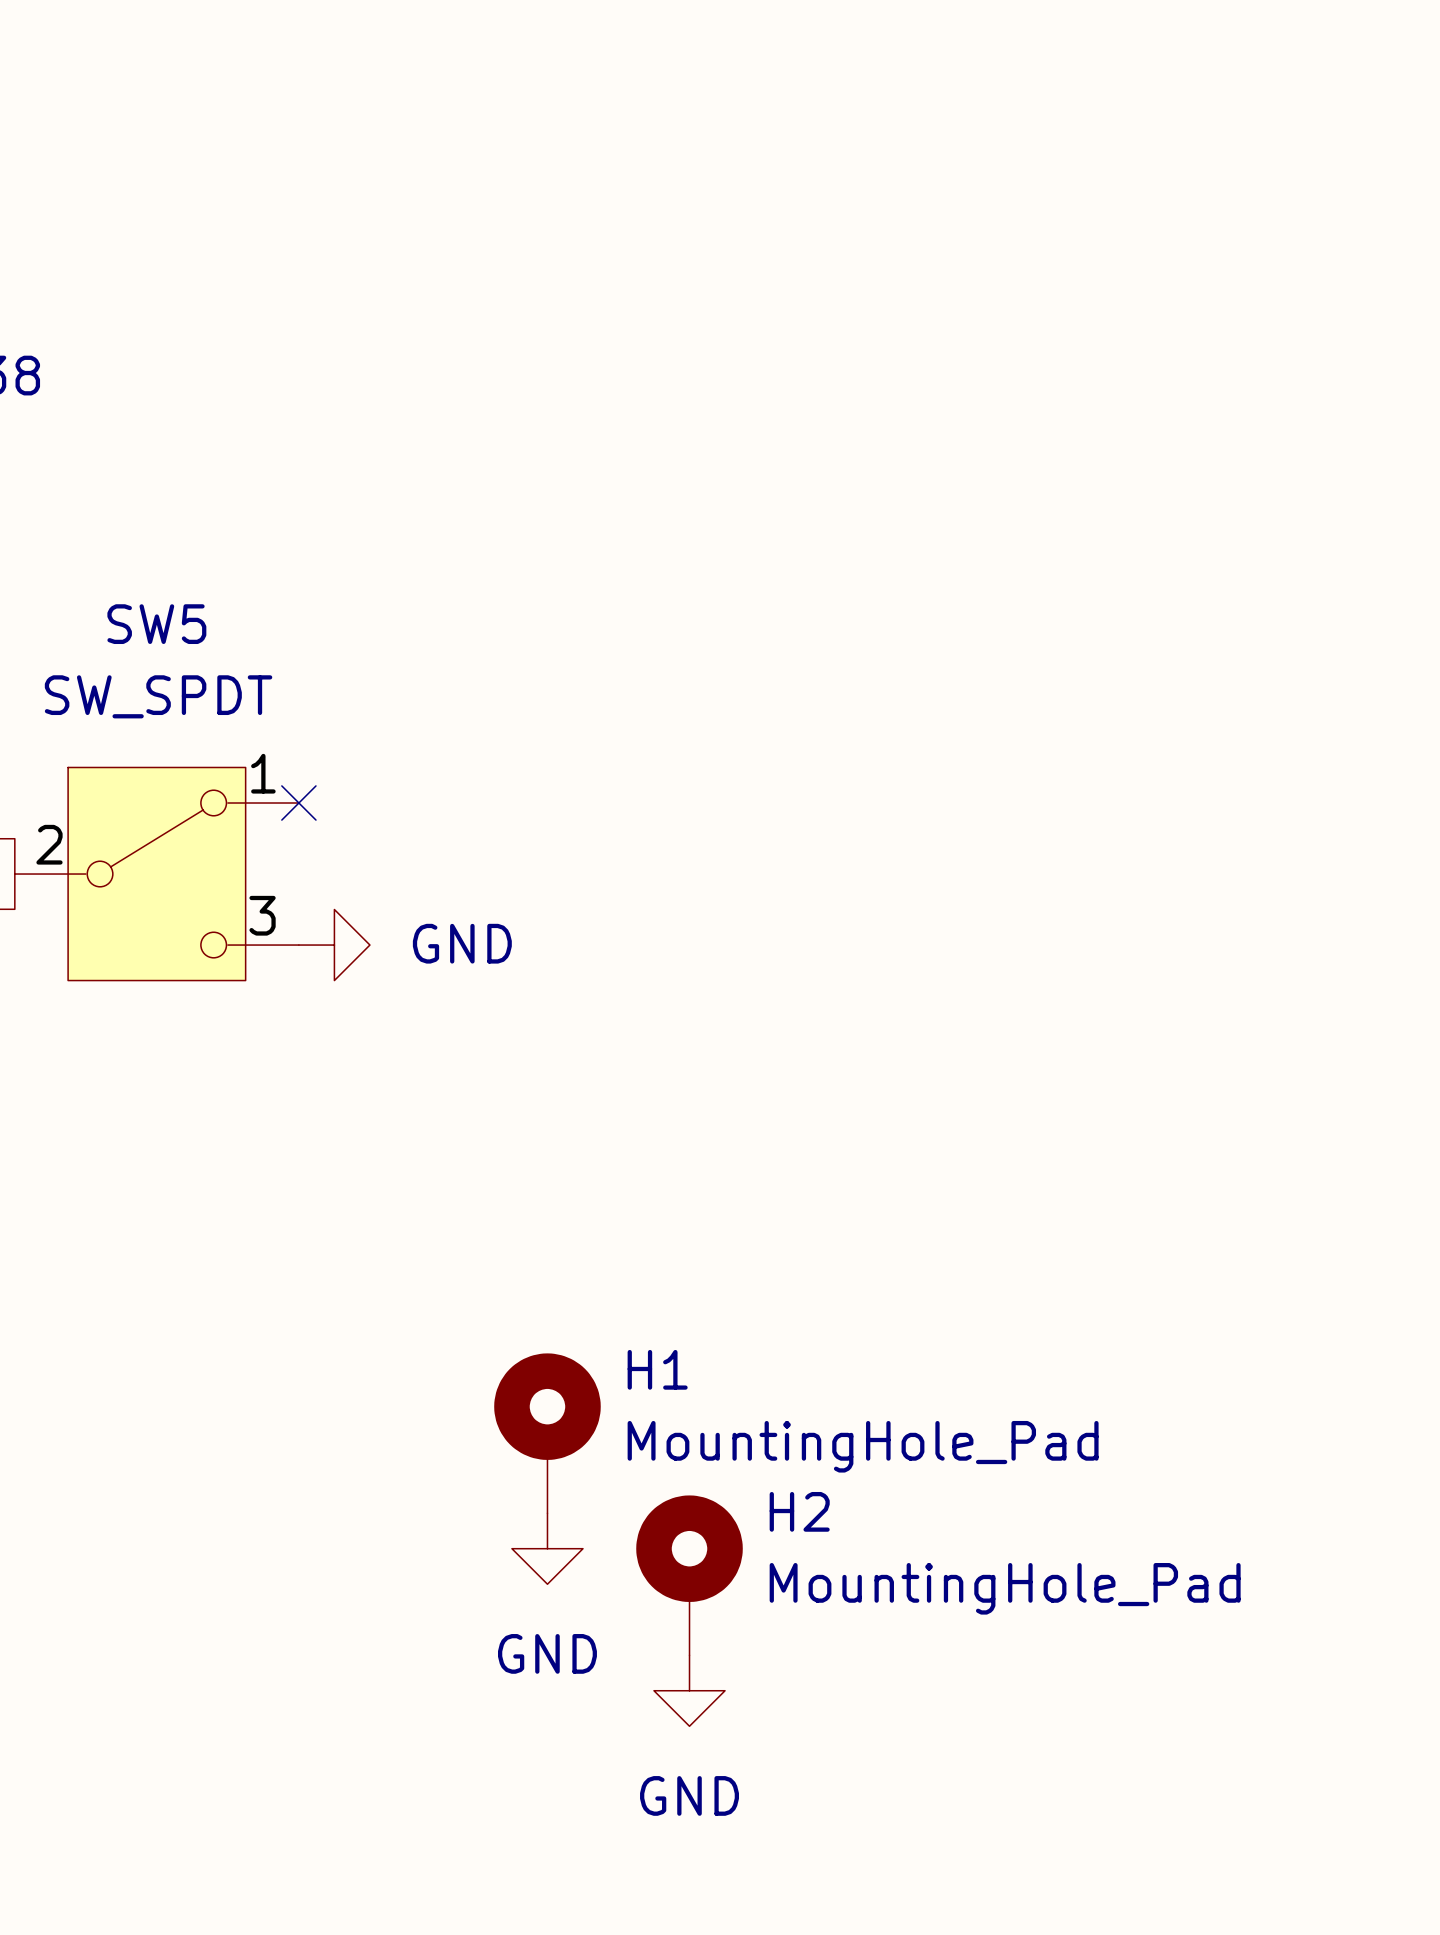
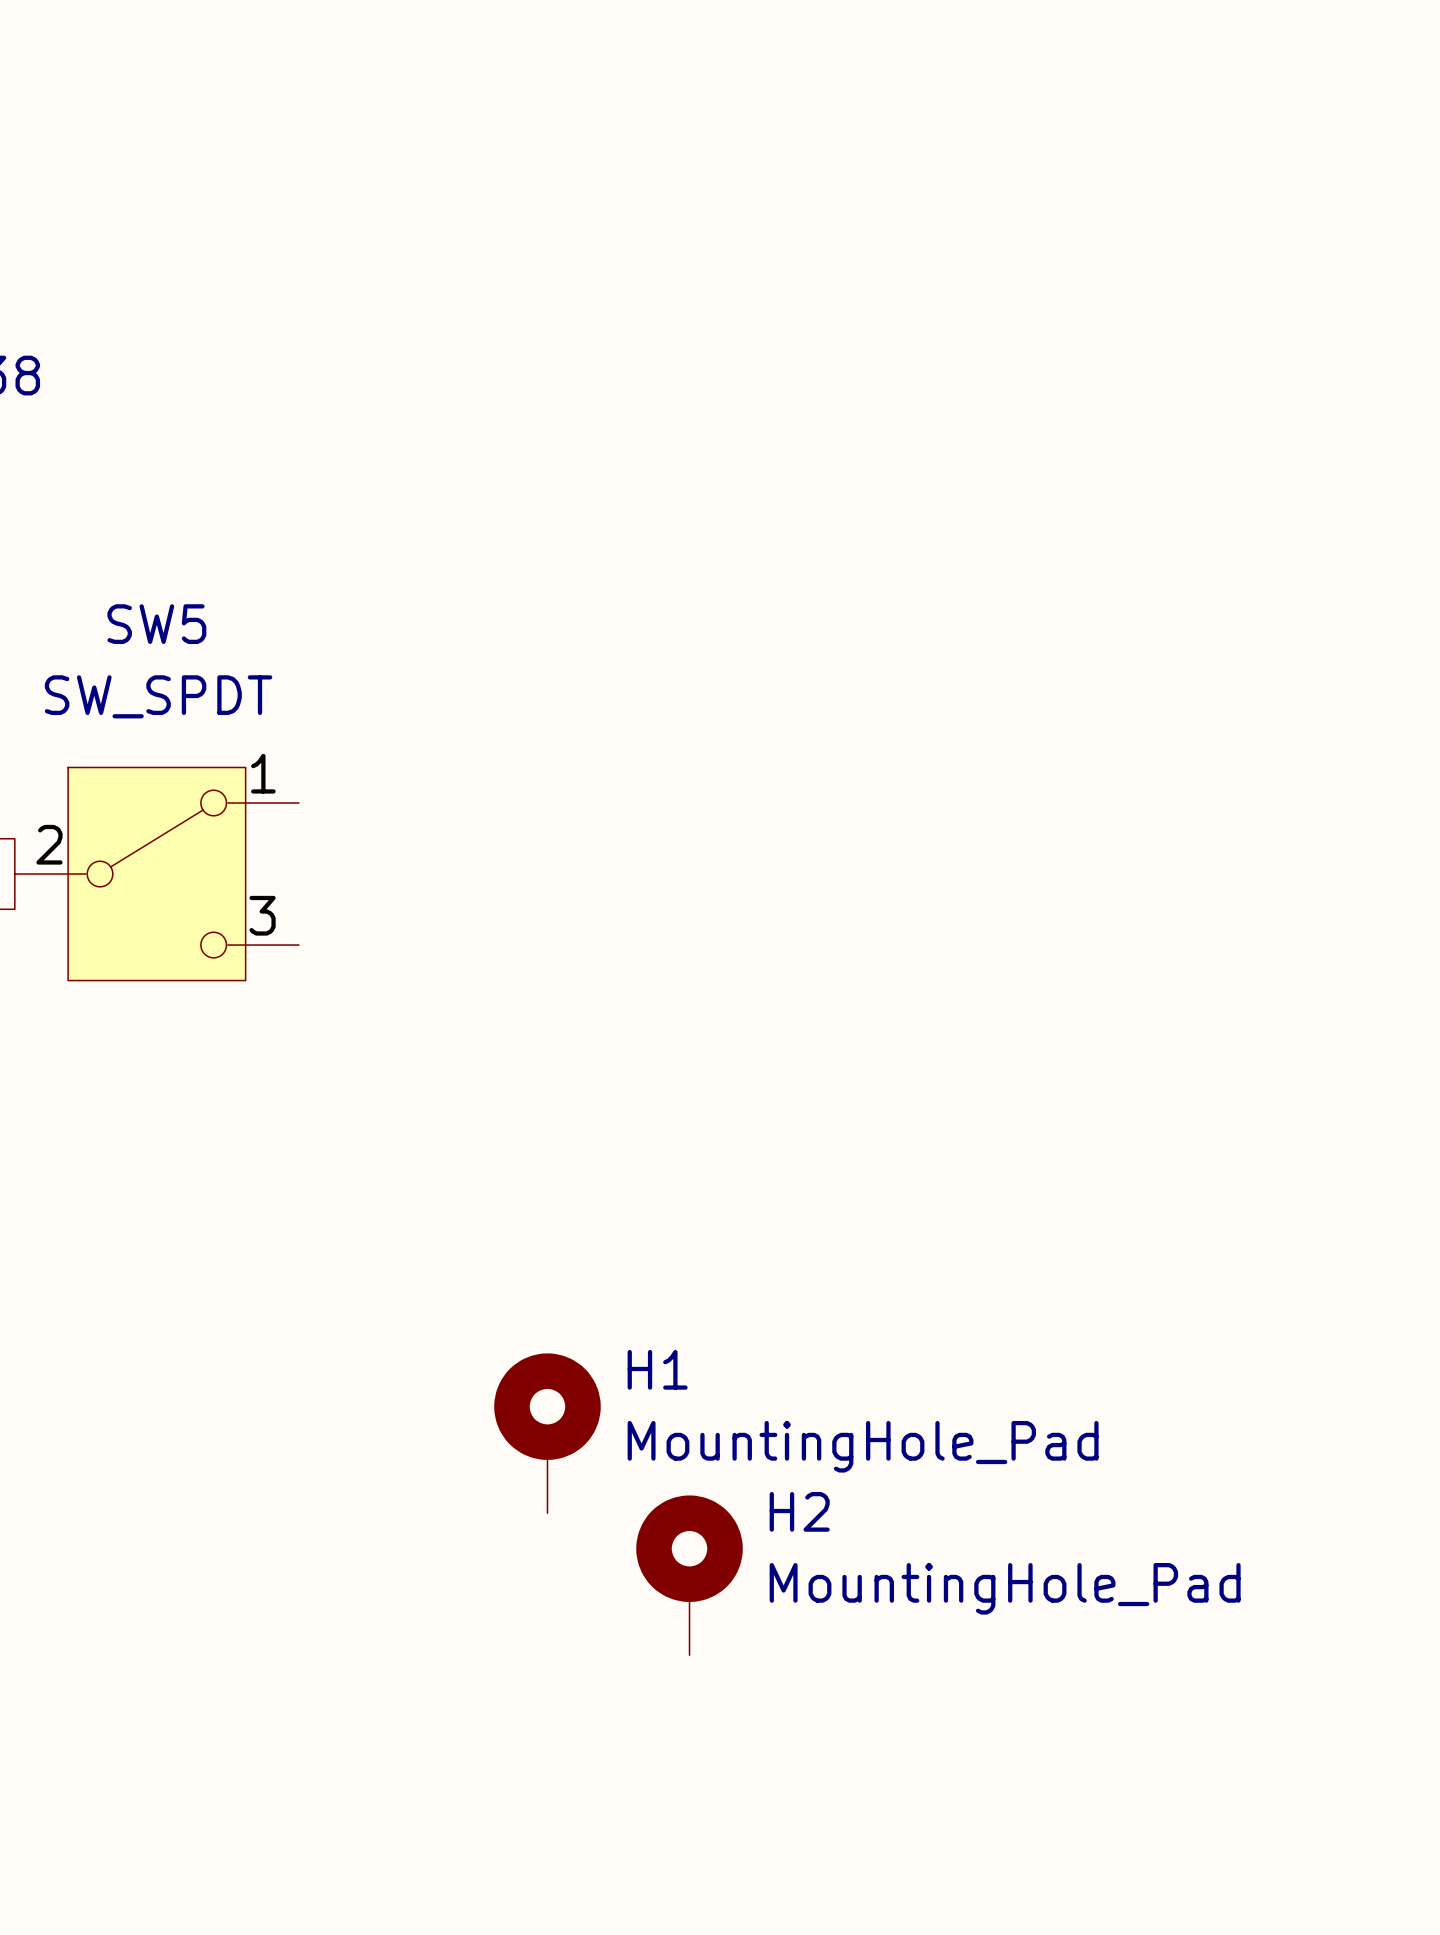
no-connect mark: (298, 803) -> none
power symbol: GND (334, 945) -> none
power symbol: GND (547, 1548) -> none
power symbol: GND (689, 1690) -> none

